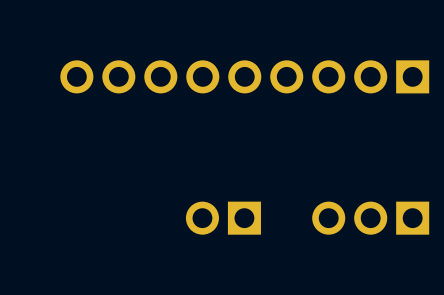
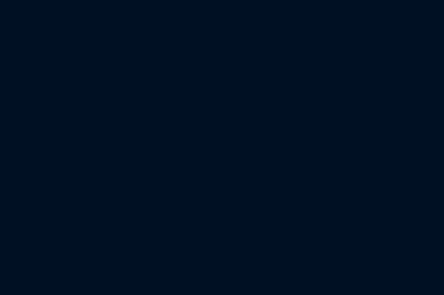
part: (244, 76) -> none
part: (223, 218) -> none
part: (370, 218) -> none

